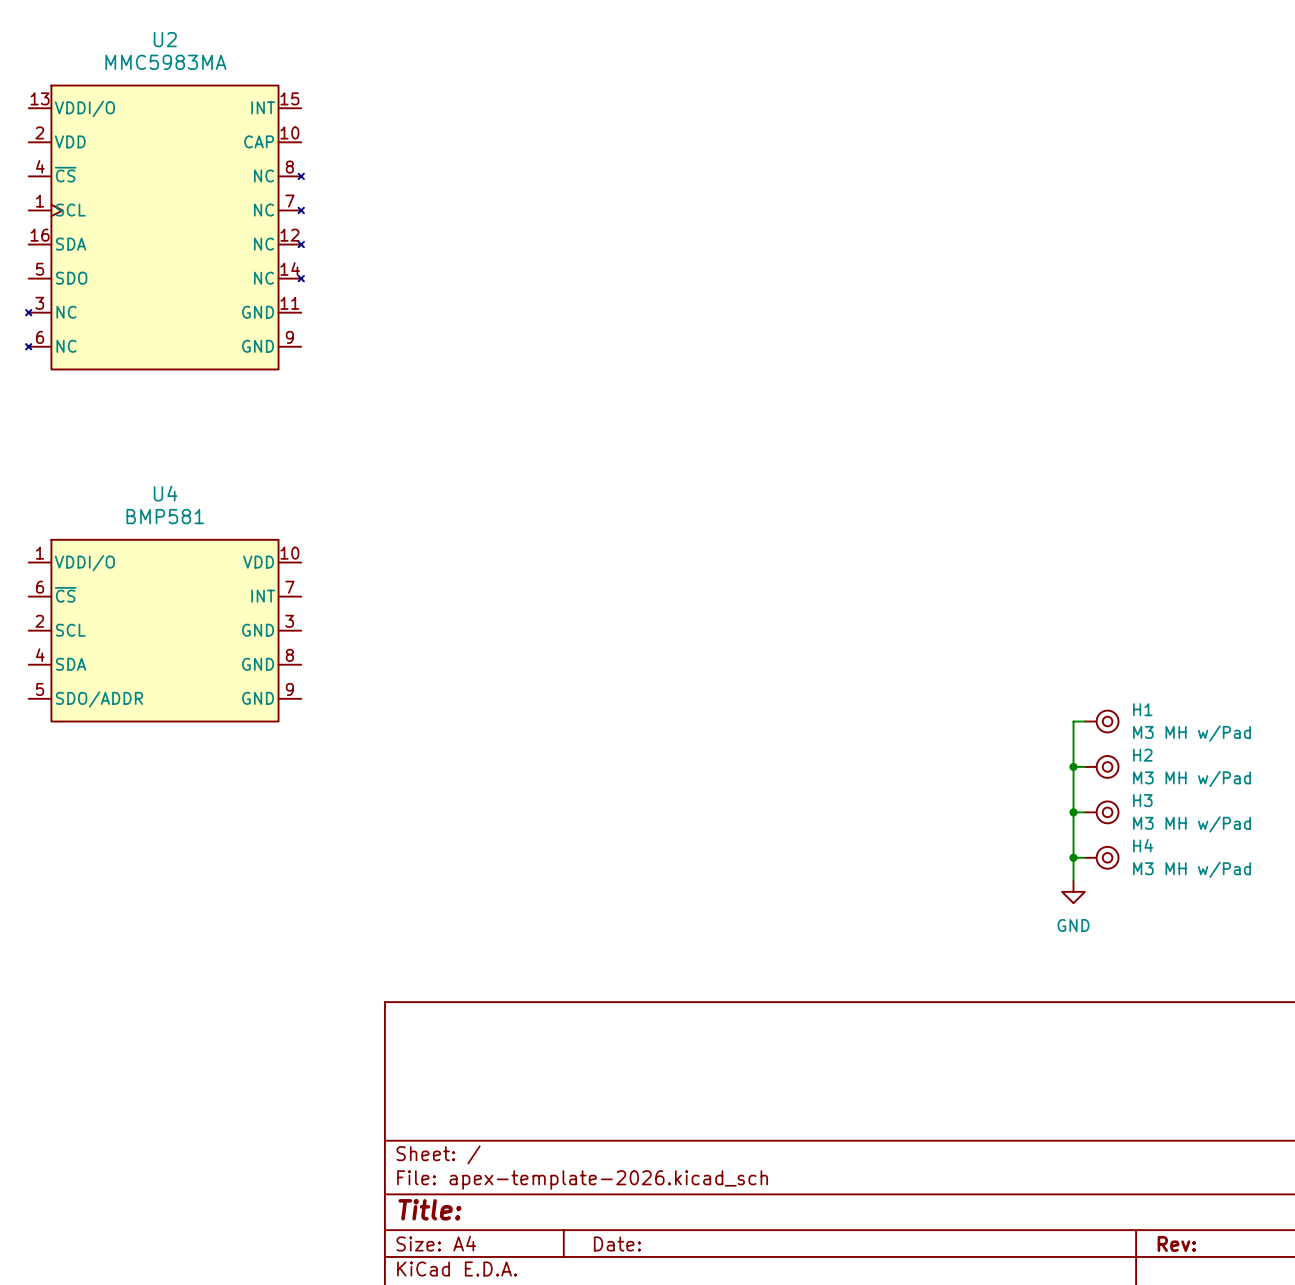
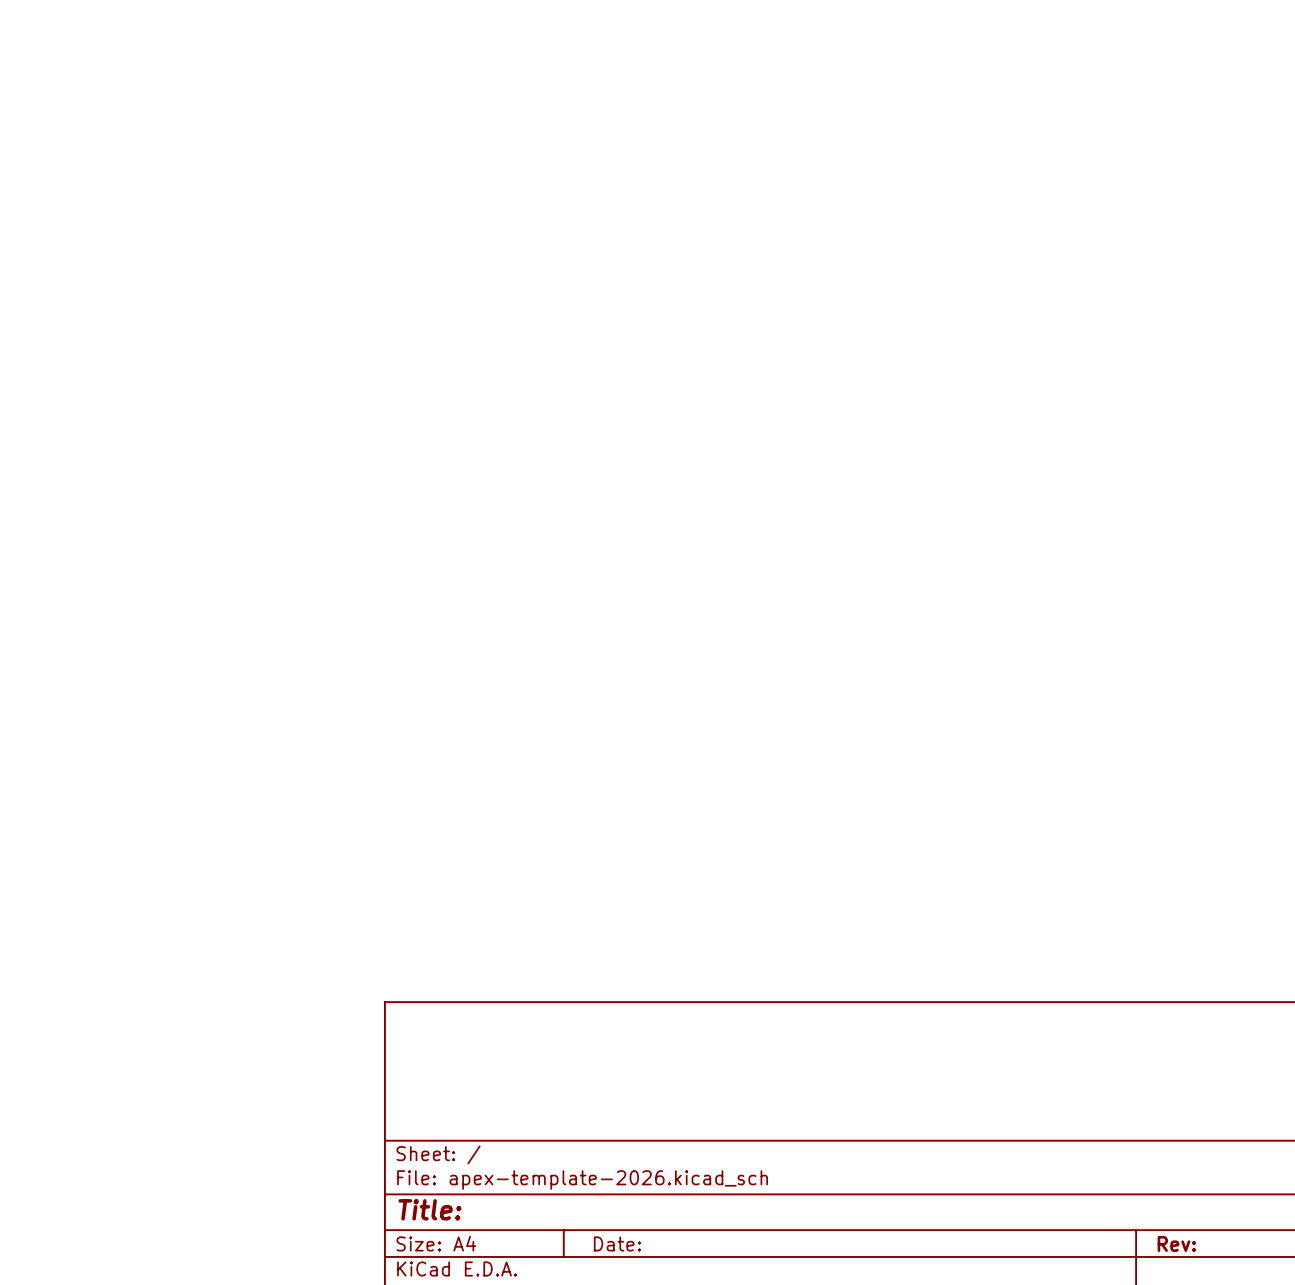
U2: MMC5983MA (164, 227) -> none
U4: BMP581 (164, 630) -> none
wire: (1084, 721) (1073, 721) (1073, 880) -> none
H1: M3 MH w/Pad (1101, 721) -> none
wire: (1073, 766) (1084, 766) -> none
junction: (1073, 766) -> none
H2: M3 MH w/Pad (1101, 766) -> none
wire: (1073, 812) (1084, 812) -> none
junction: (1073, 812) -> none
H3: M3 MH w/Pad (1101, 812) -> none
wire: (1073, 857) (1084, 857) -> none
junction: (1073, 857) -> none
H4: M3 MH w/Pad (1101, 857) -> none
power symbol: GND (1073, 891) -> none

